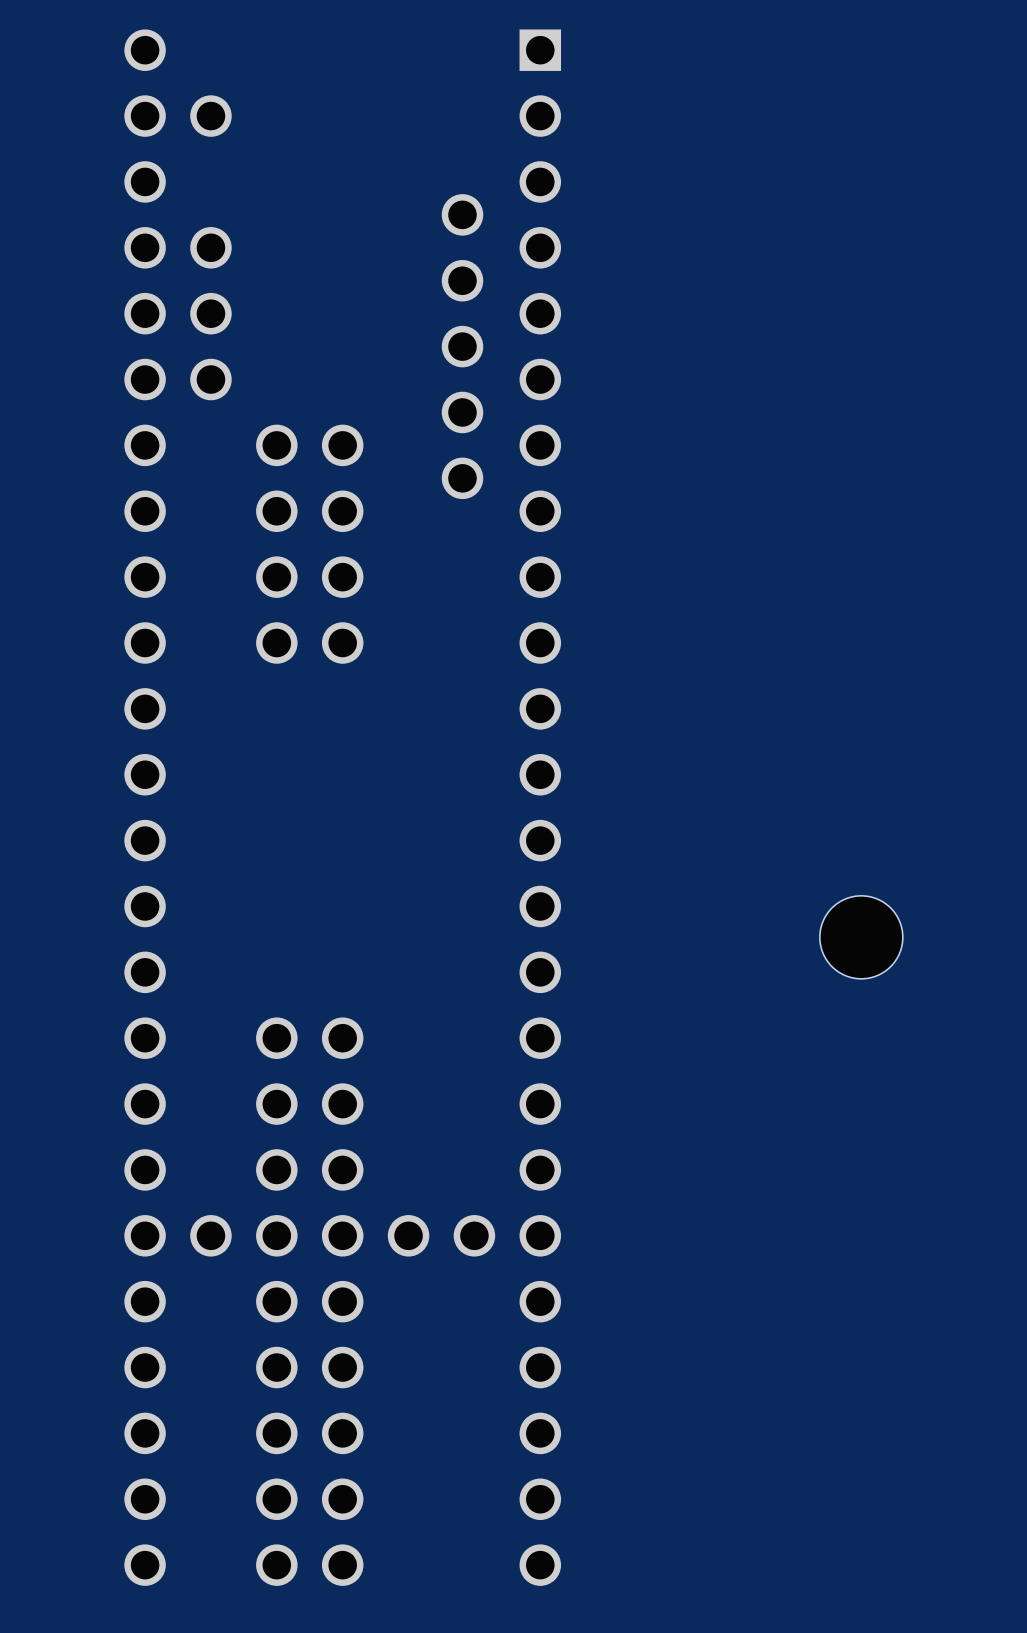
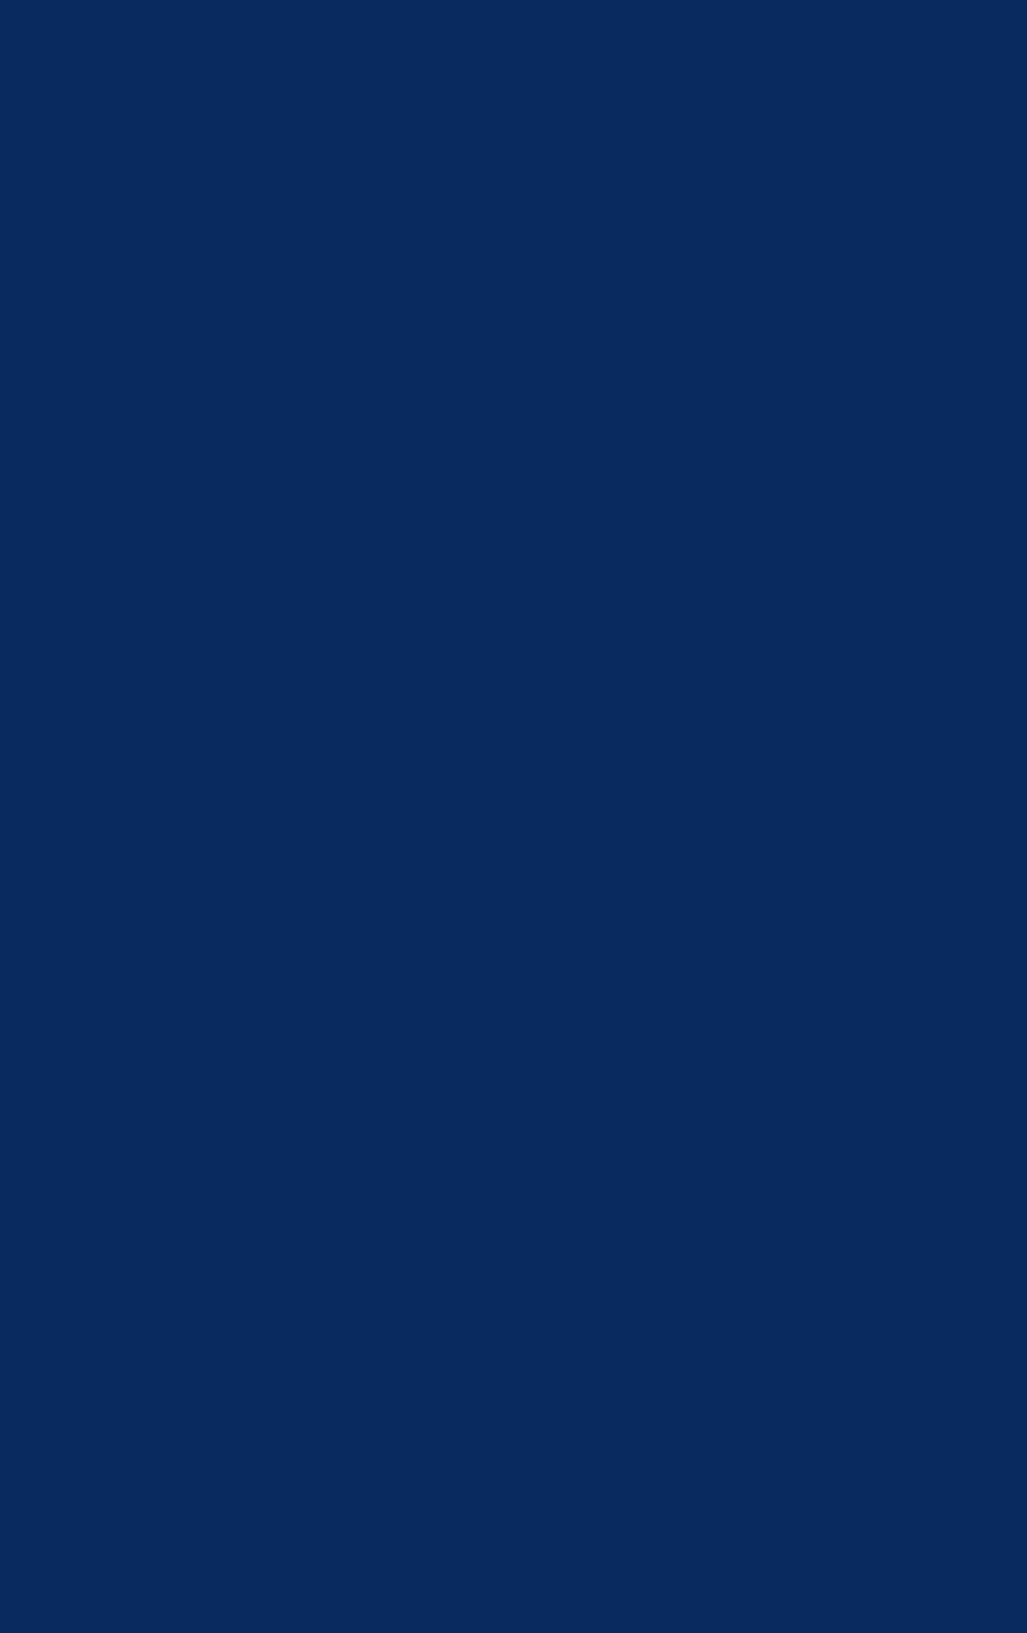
part: (342, 807) -> none
part: (861, 937) -> none

